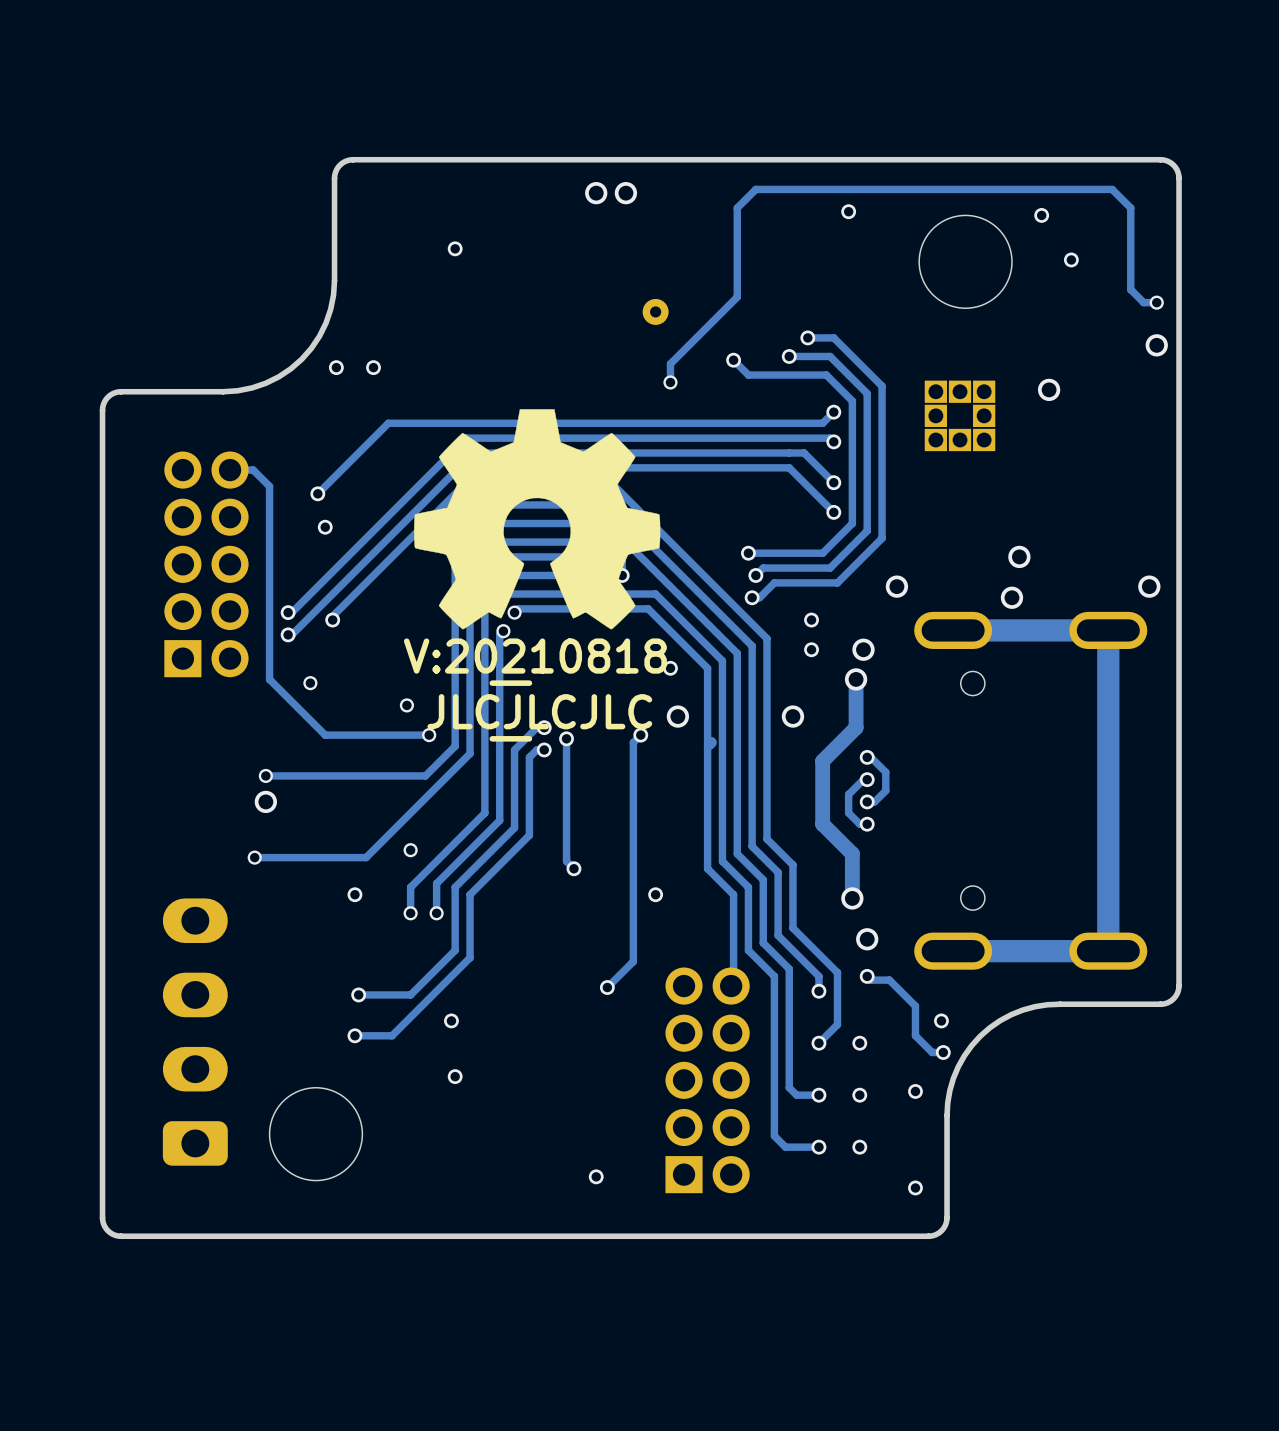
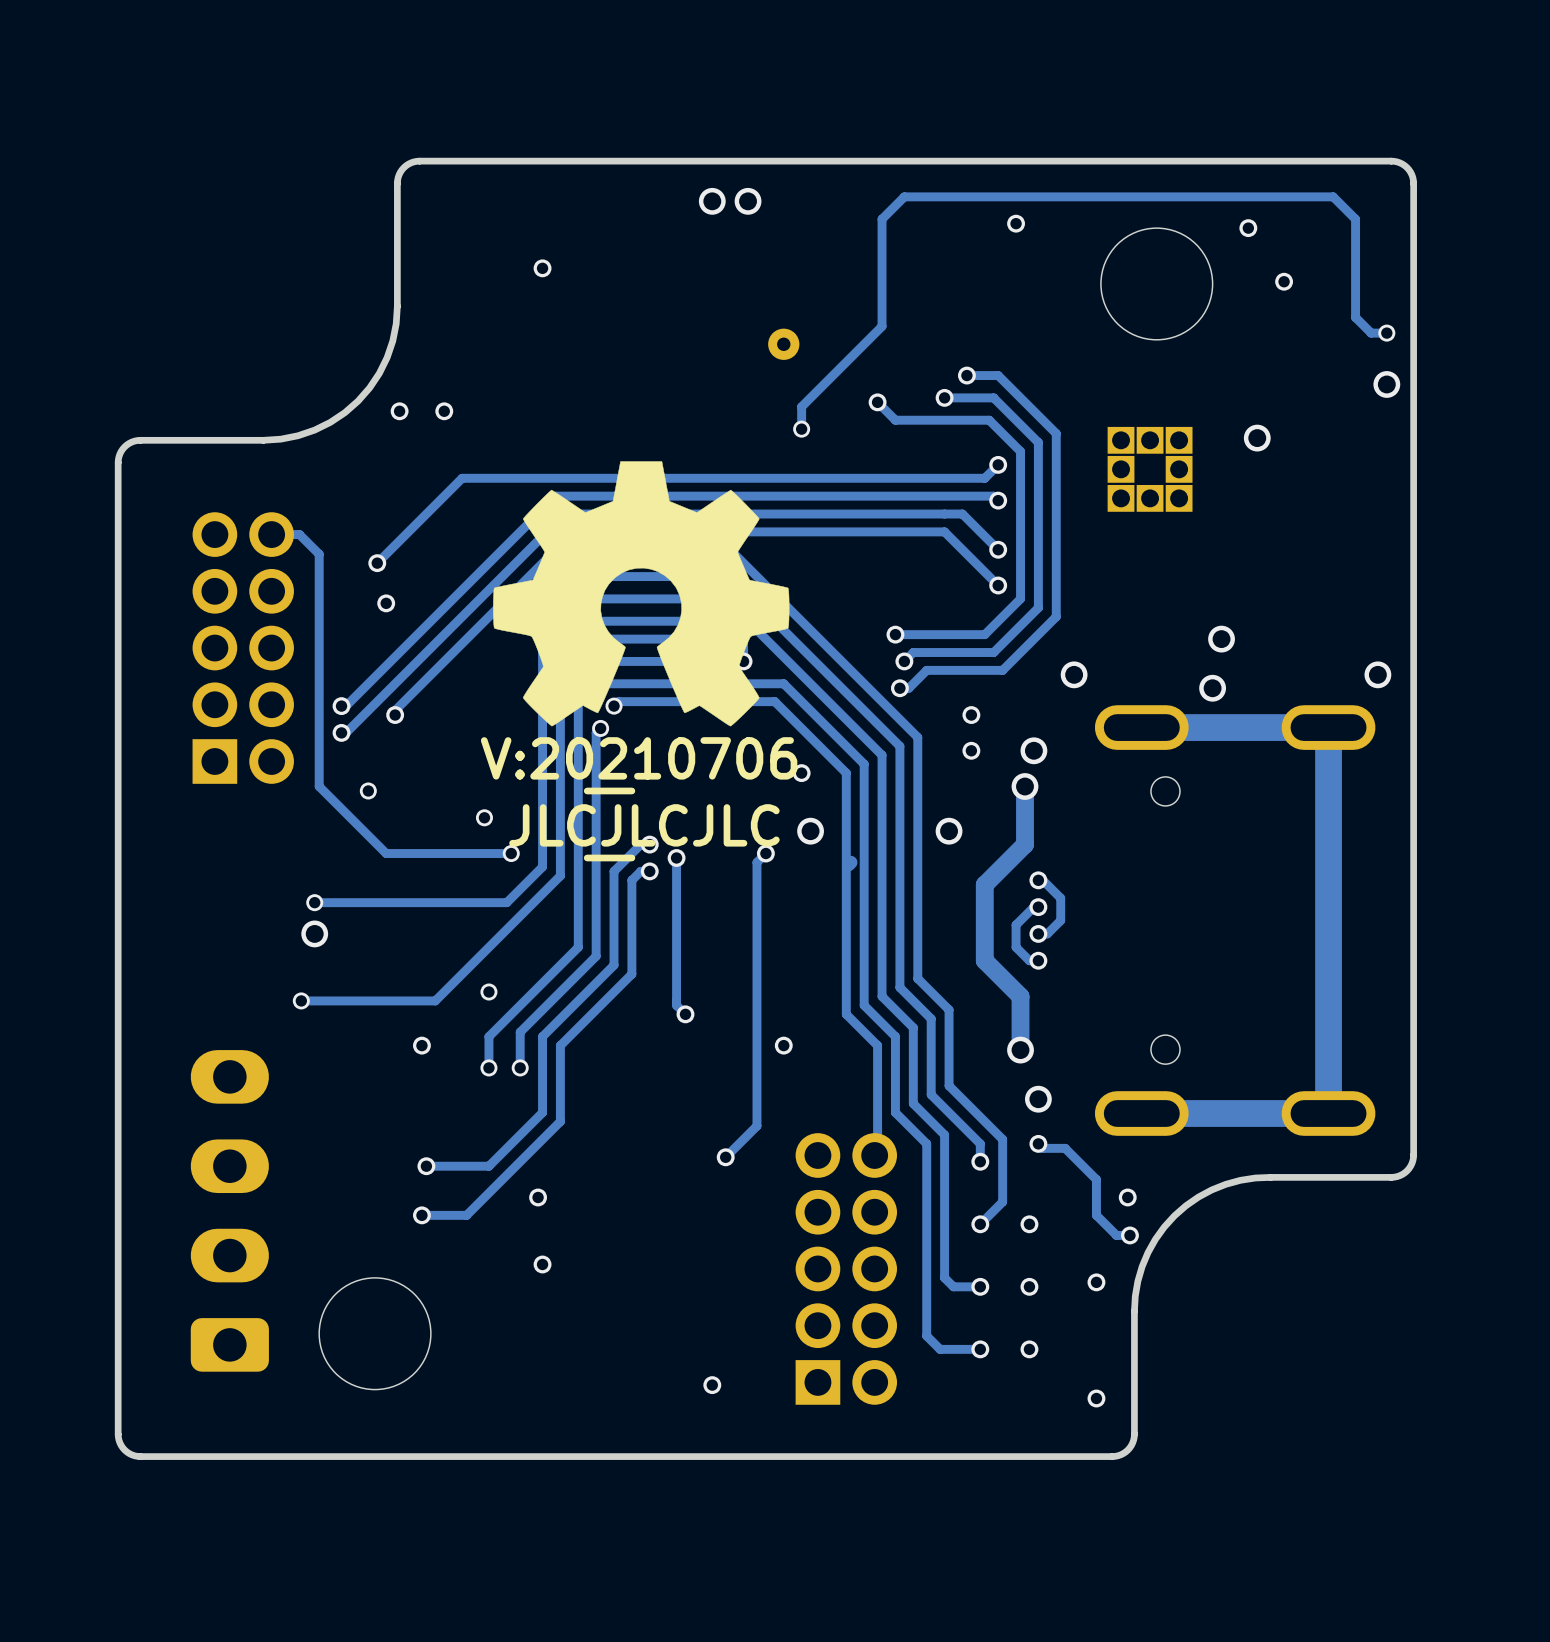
drawing shape: [403, 638, 667, 686] -> [480, 737, 798, 795]

